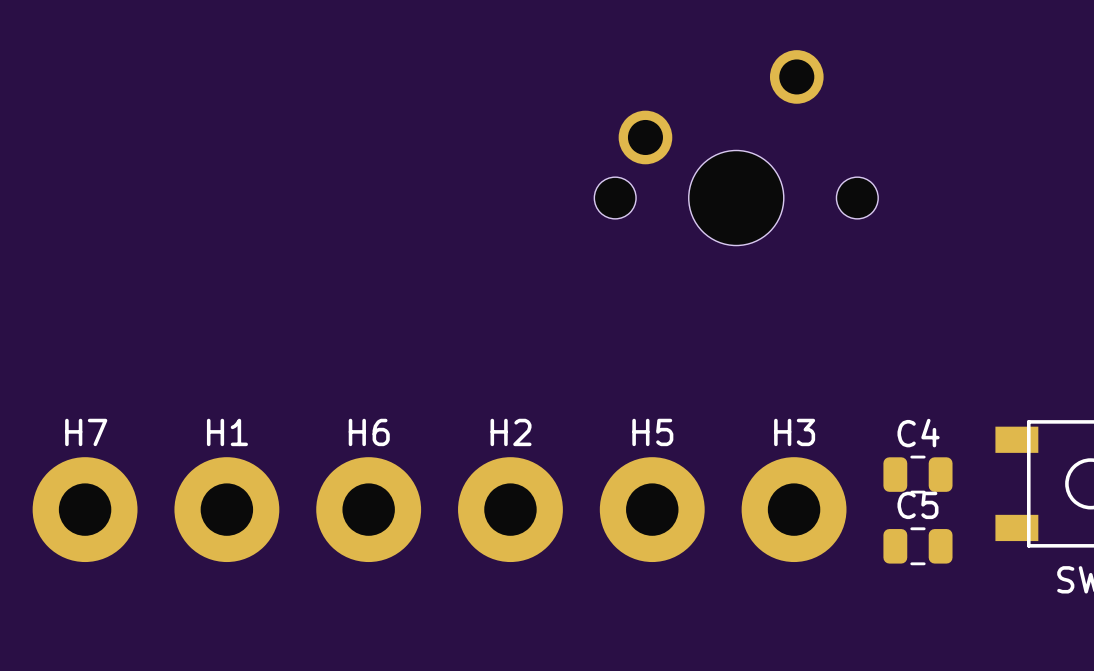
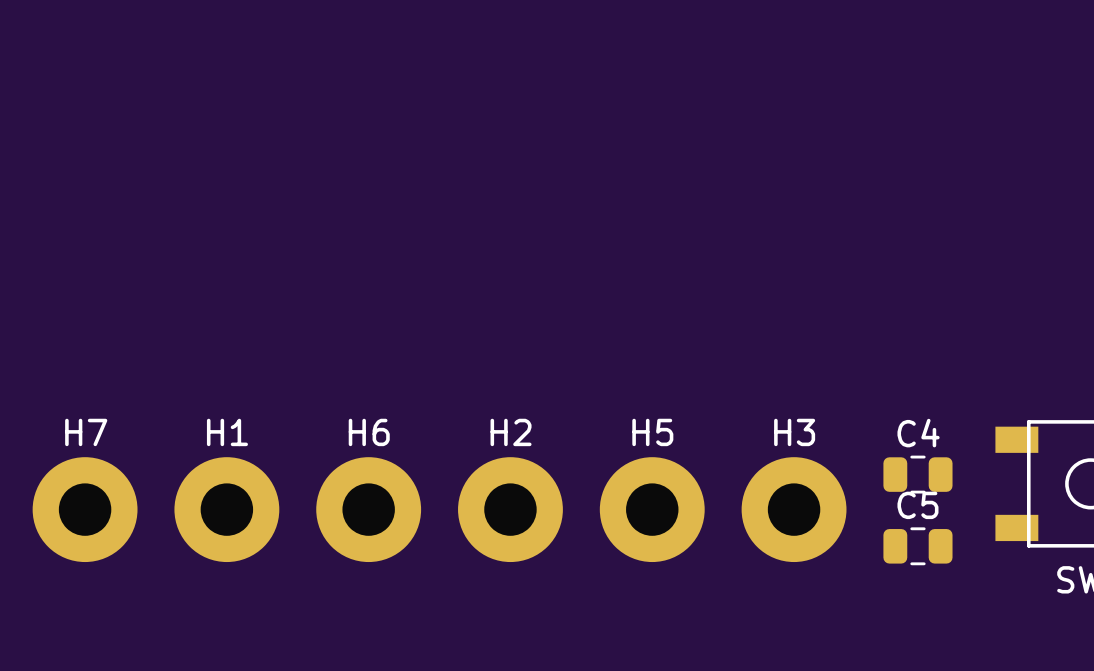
part: (736, 147) -> none

